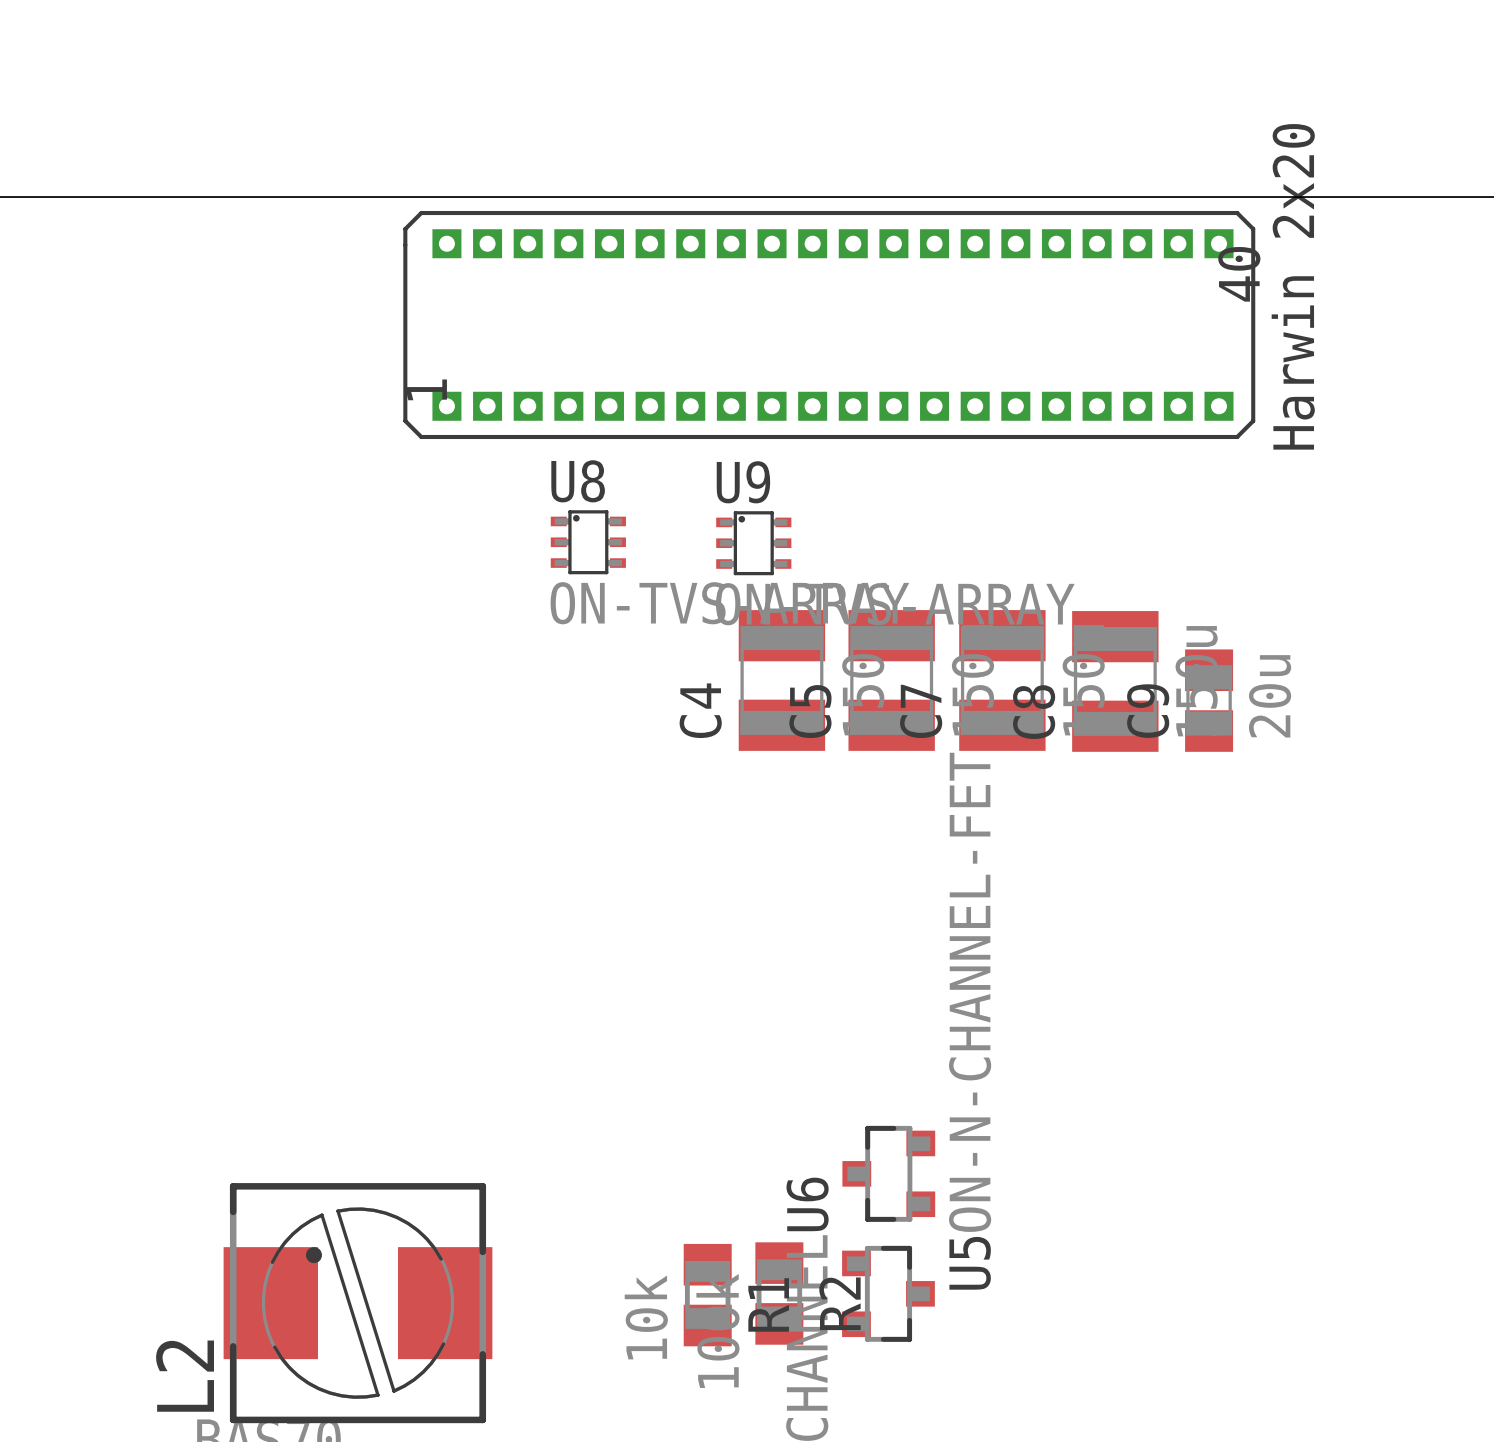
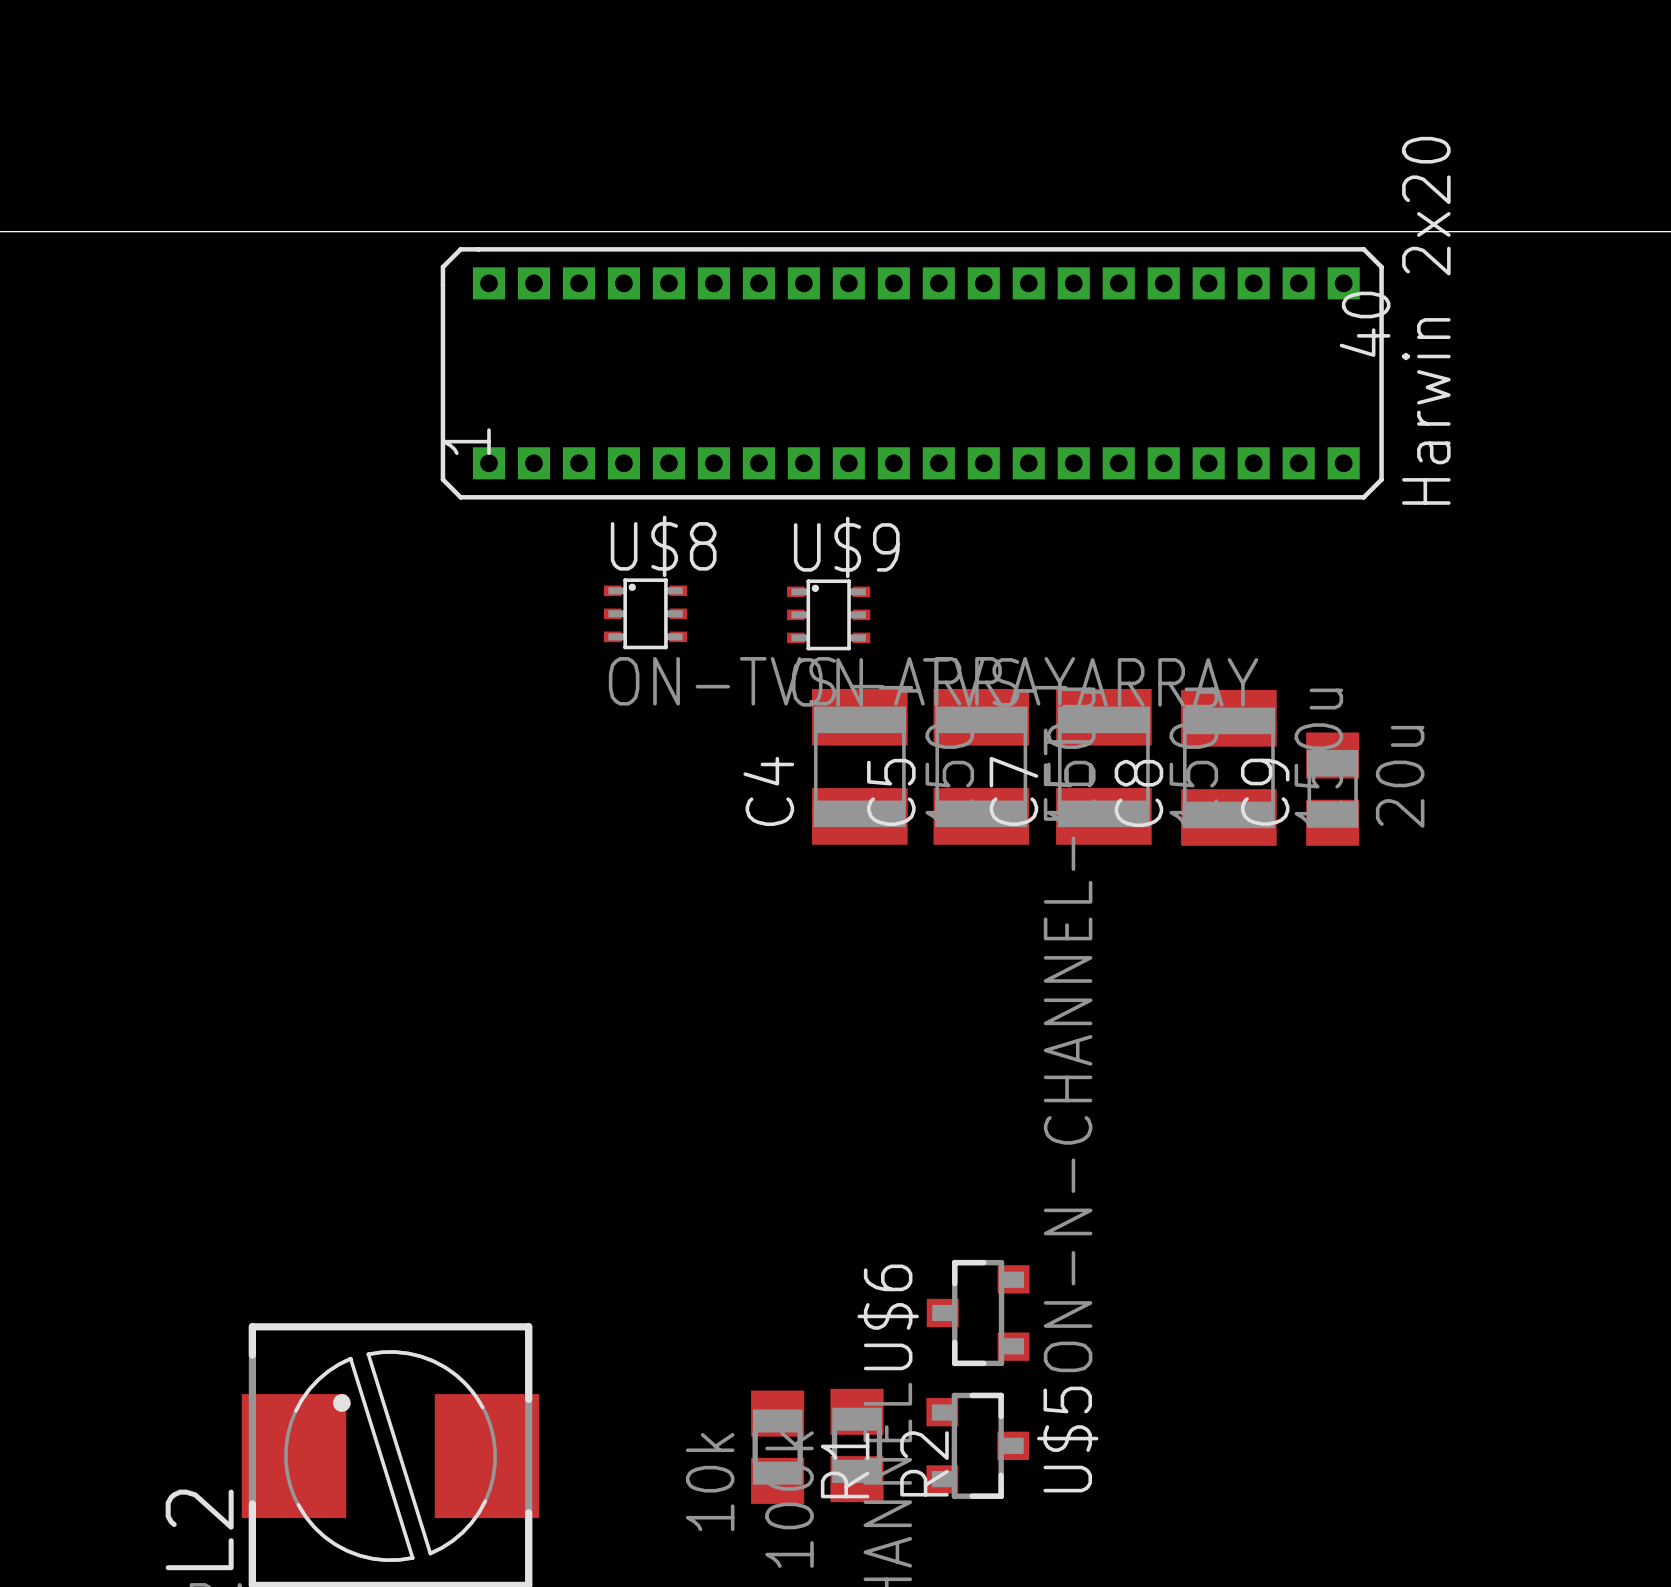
U8 name: U8 (578, 481) -> U$8 (663, 546)
U9 name: U9 (743, 482) -> U$9 (846, 547)
U6 name: U6 (807, 1204) -> U$6 (888, 1317)
U5 name: U5 (970, 1263) -> U$5 (1067, 1439)

